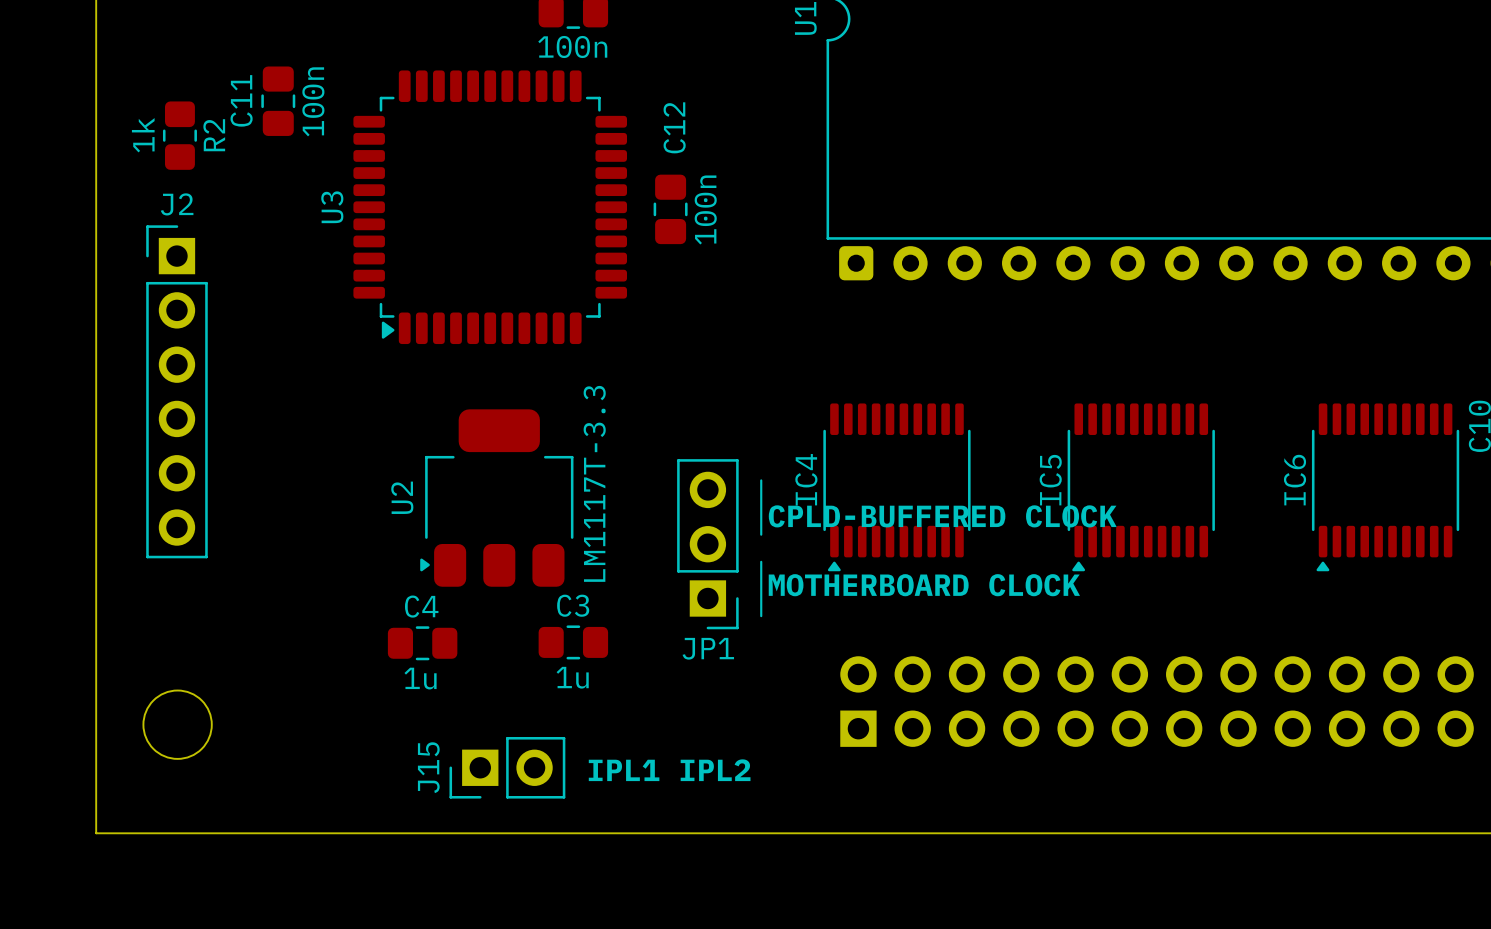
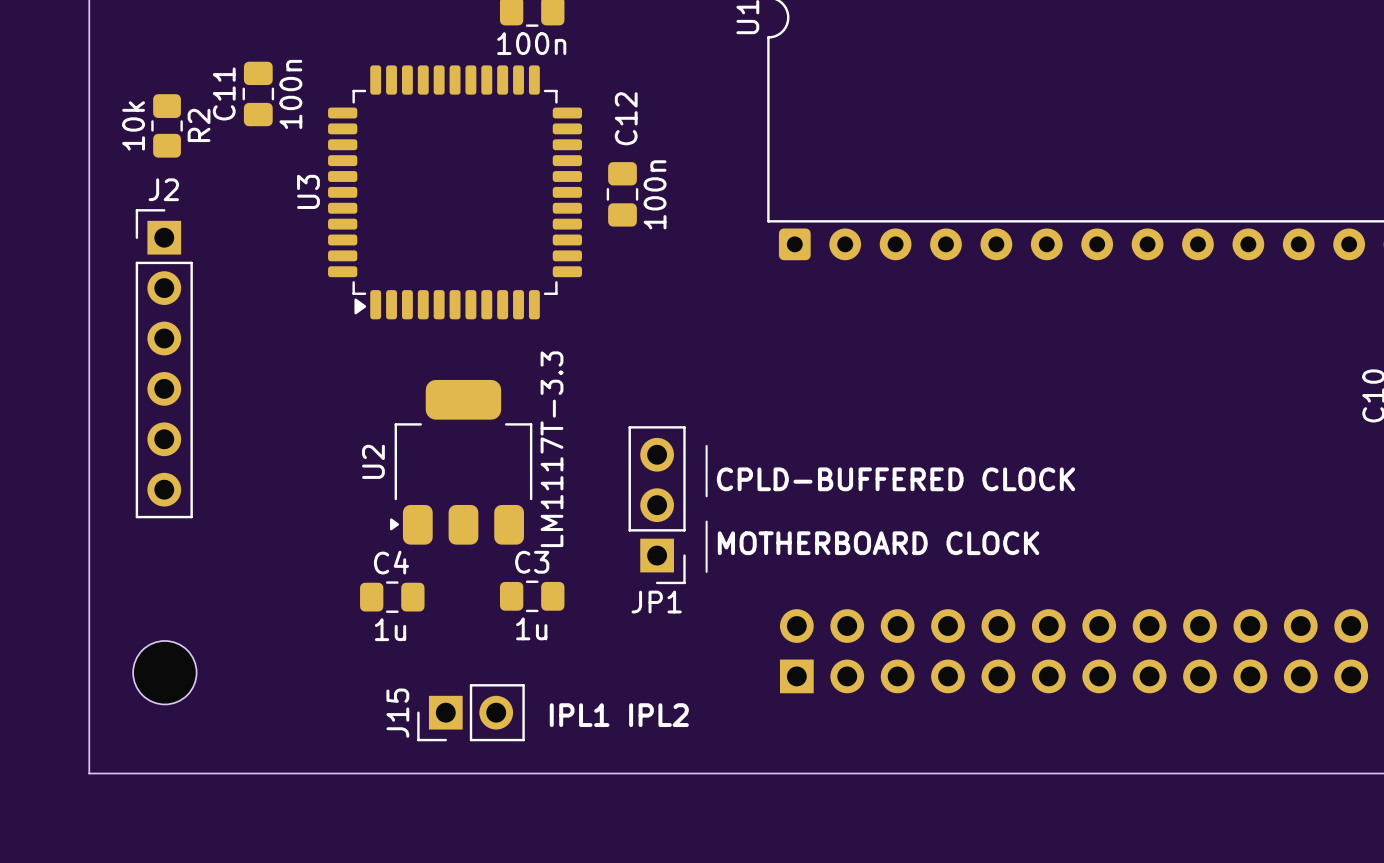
R2 value: 1k (143, 135) -> 10k (133, 125)
IC4: (896, 487) -> none
IC5: (1141, 487) -> none
IC6: (1385, 487) -> none

